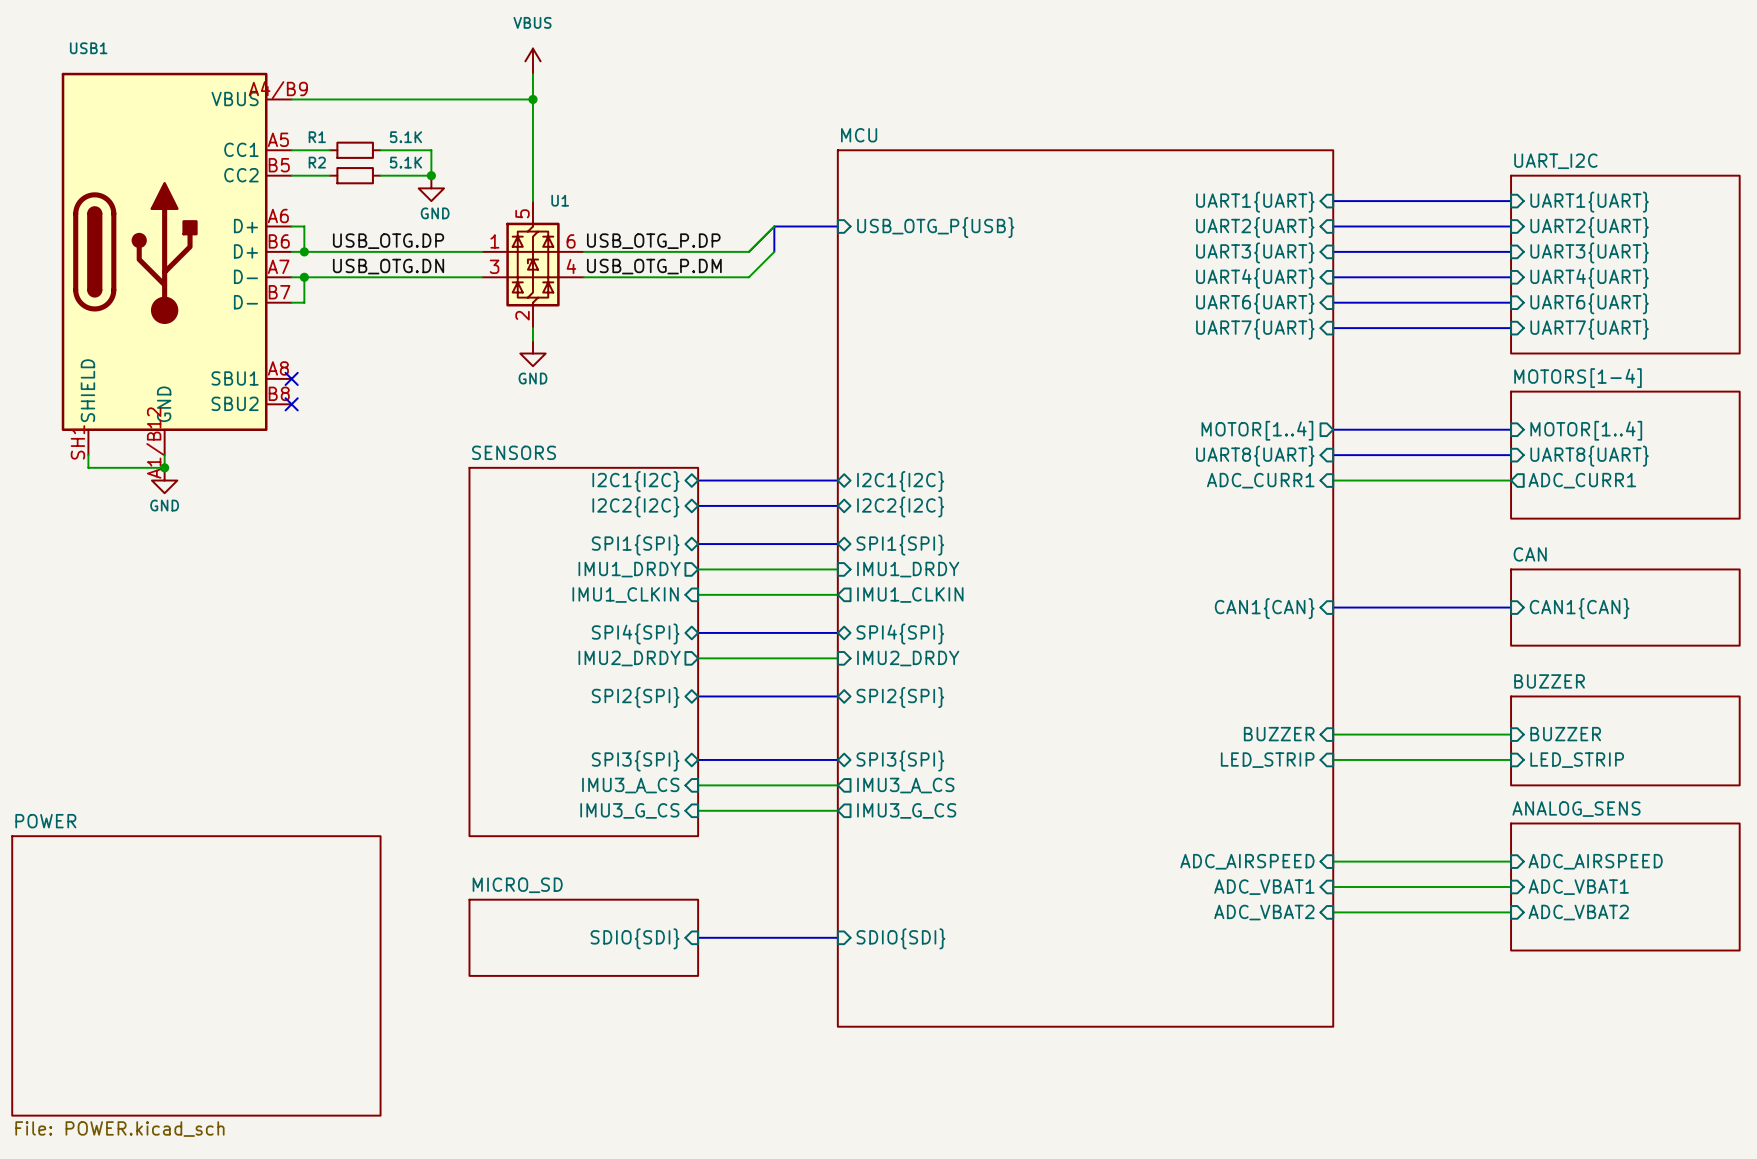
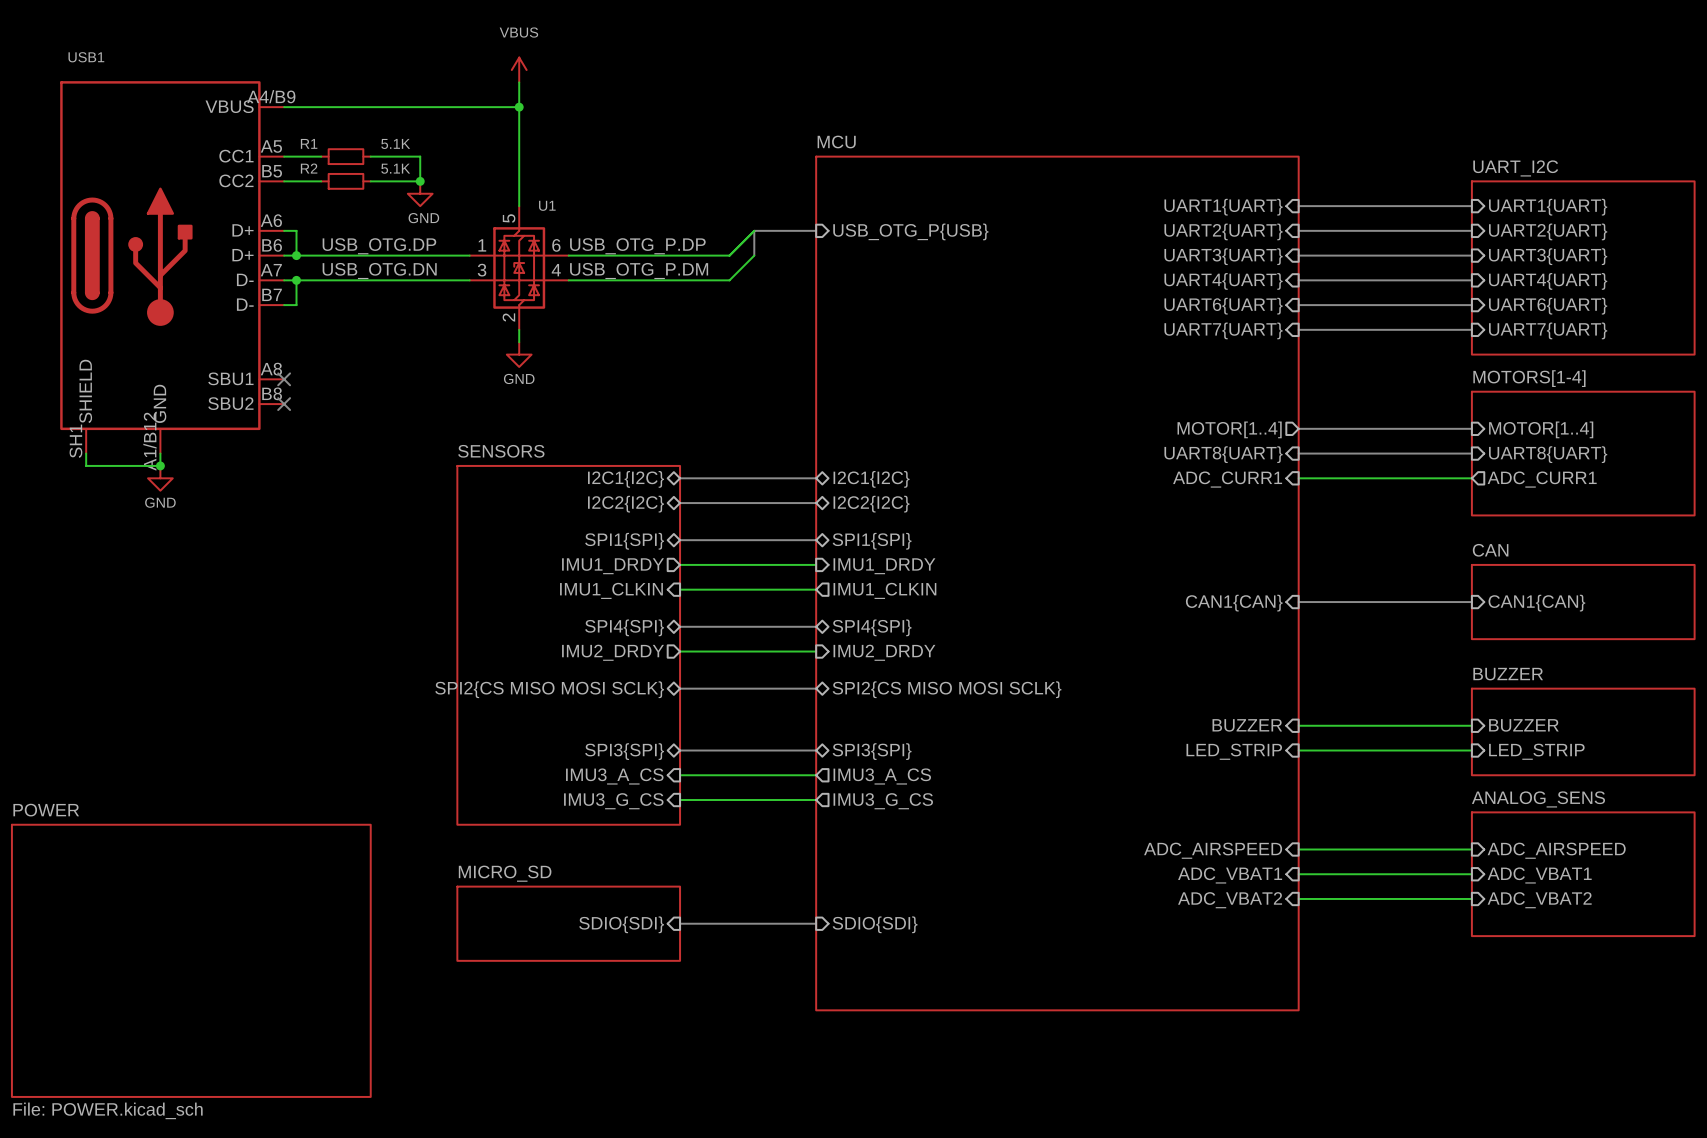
sheet pin: SPI2{SPI} (635, 697) -> SPI2{CS MISO MOSI SCLK} (549, 689)
sheet pin: SPI2{SPI} (900, 697) -> SPI2{CS MISO MOSI SCLK} (947, 689)

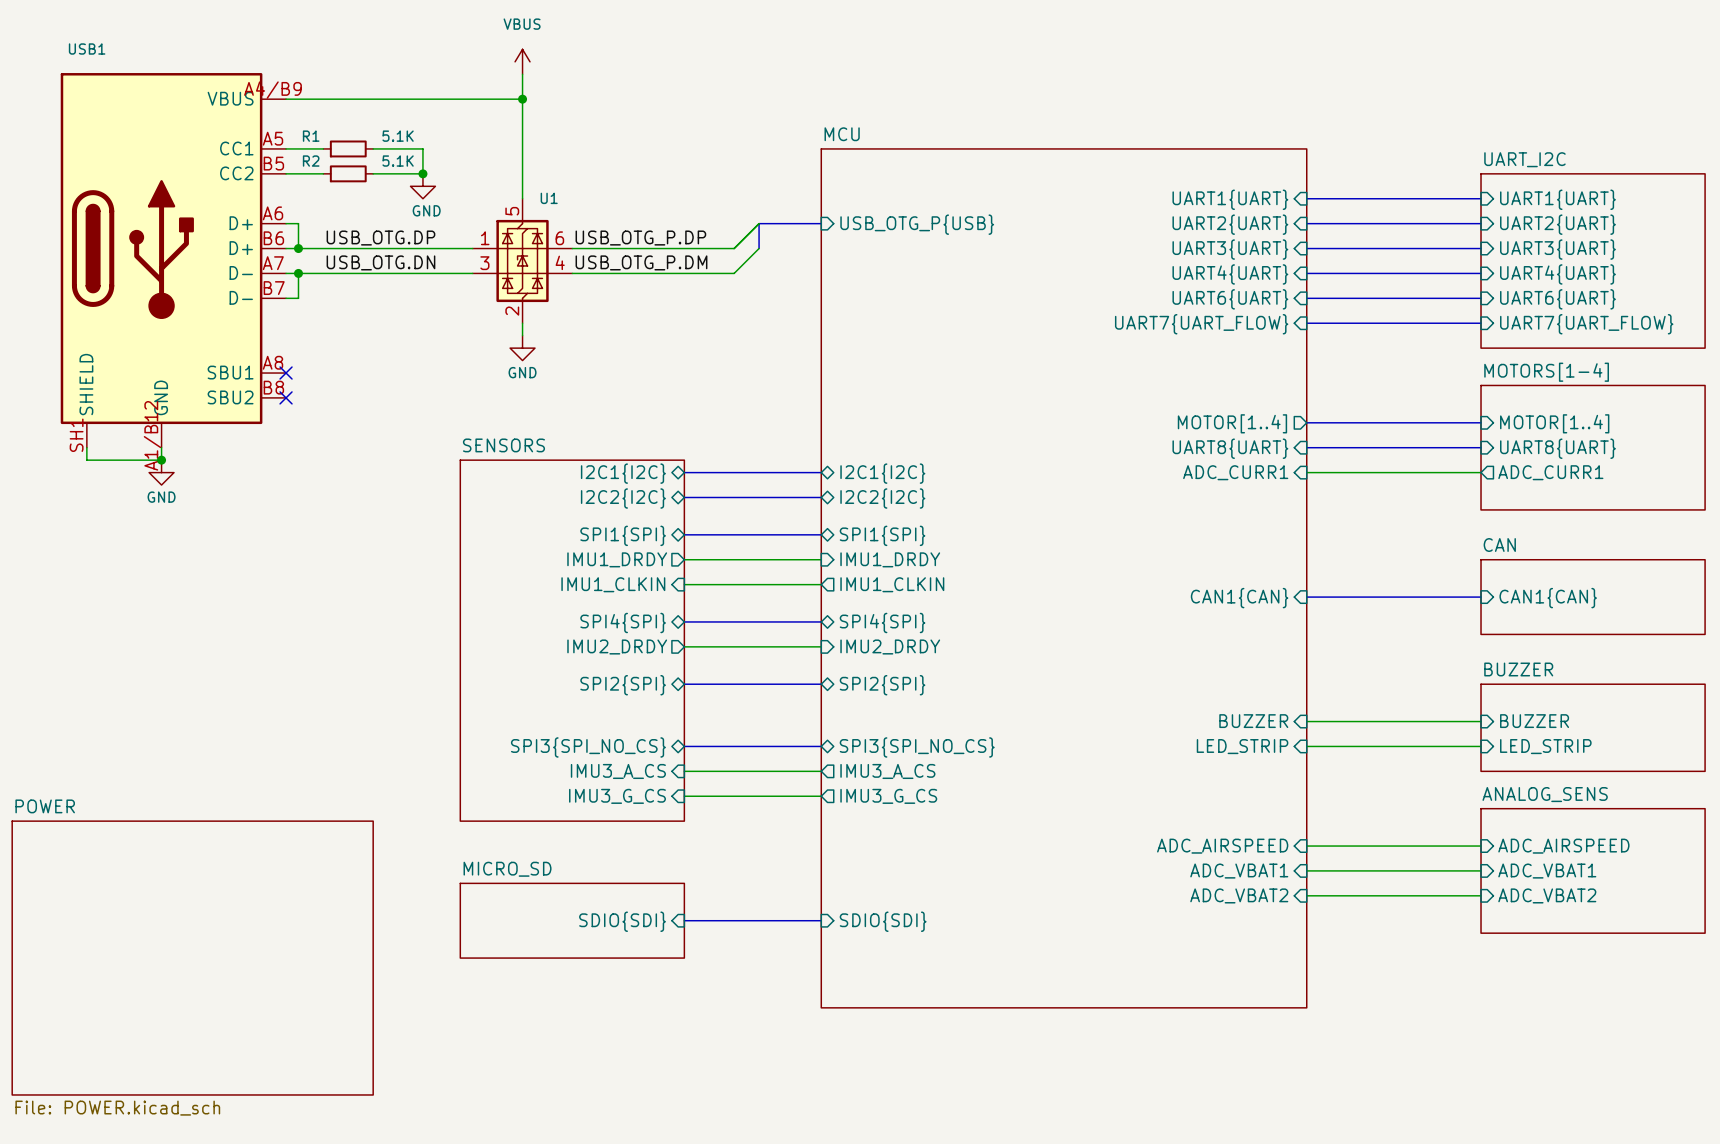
sheet pin: UART7{UART} (1223, 330) -> UART7{UART_FLOW} (1201, 324)
sheet pin: UART7{UART} (1548, 330) -> UART7{UART_FLOW} (1586, 324)
sheet pin: SPI2{CS MISO MOSI SCLK} (549, 689) -> SPI2{SPI} (623, 685)
sheet pin: SPI2{CS MISO MOSI SCLK} (947, 689) -> SPI2{SPI} (882, 685)
sheet pin: SPI3{SPI} (624, 751) -> SPI3{SPI_NO_CS} (588, 747)
sheet pin: SPI3{SPI} (872, 751) -> SPI3{SPI_NO_CS} (917, 747)

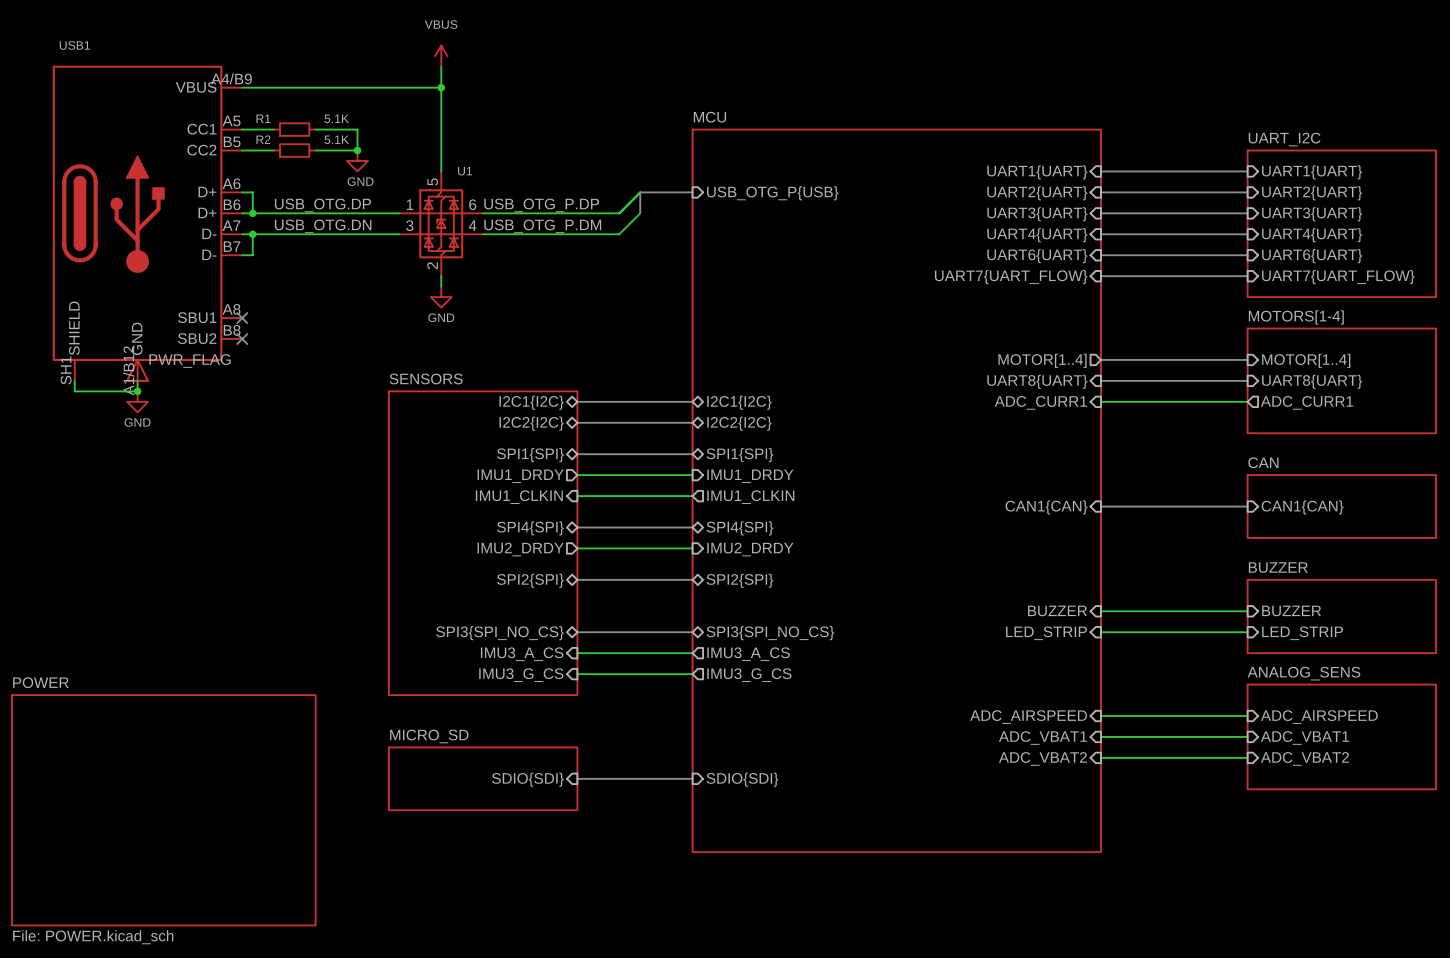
power symbol: none -> PWR_FLAG (137, 370)

